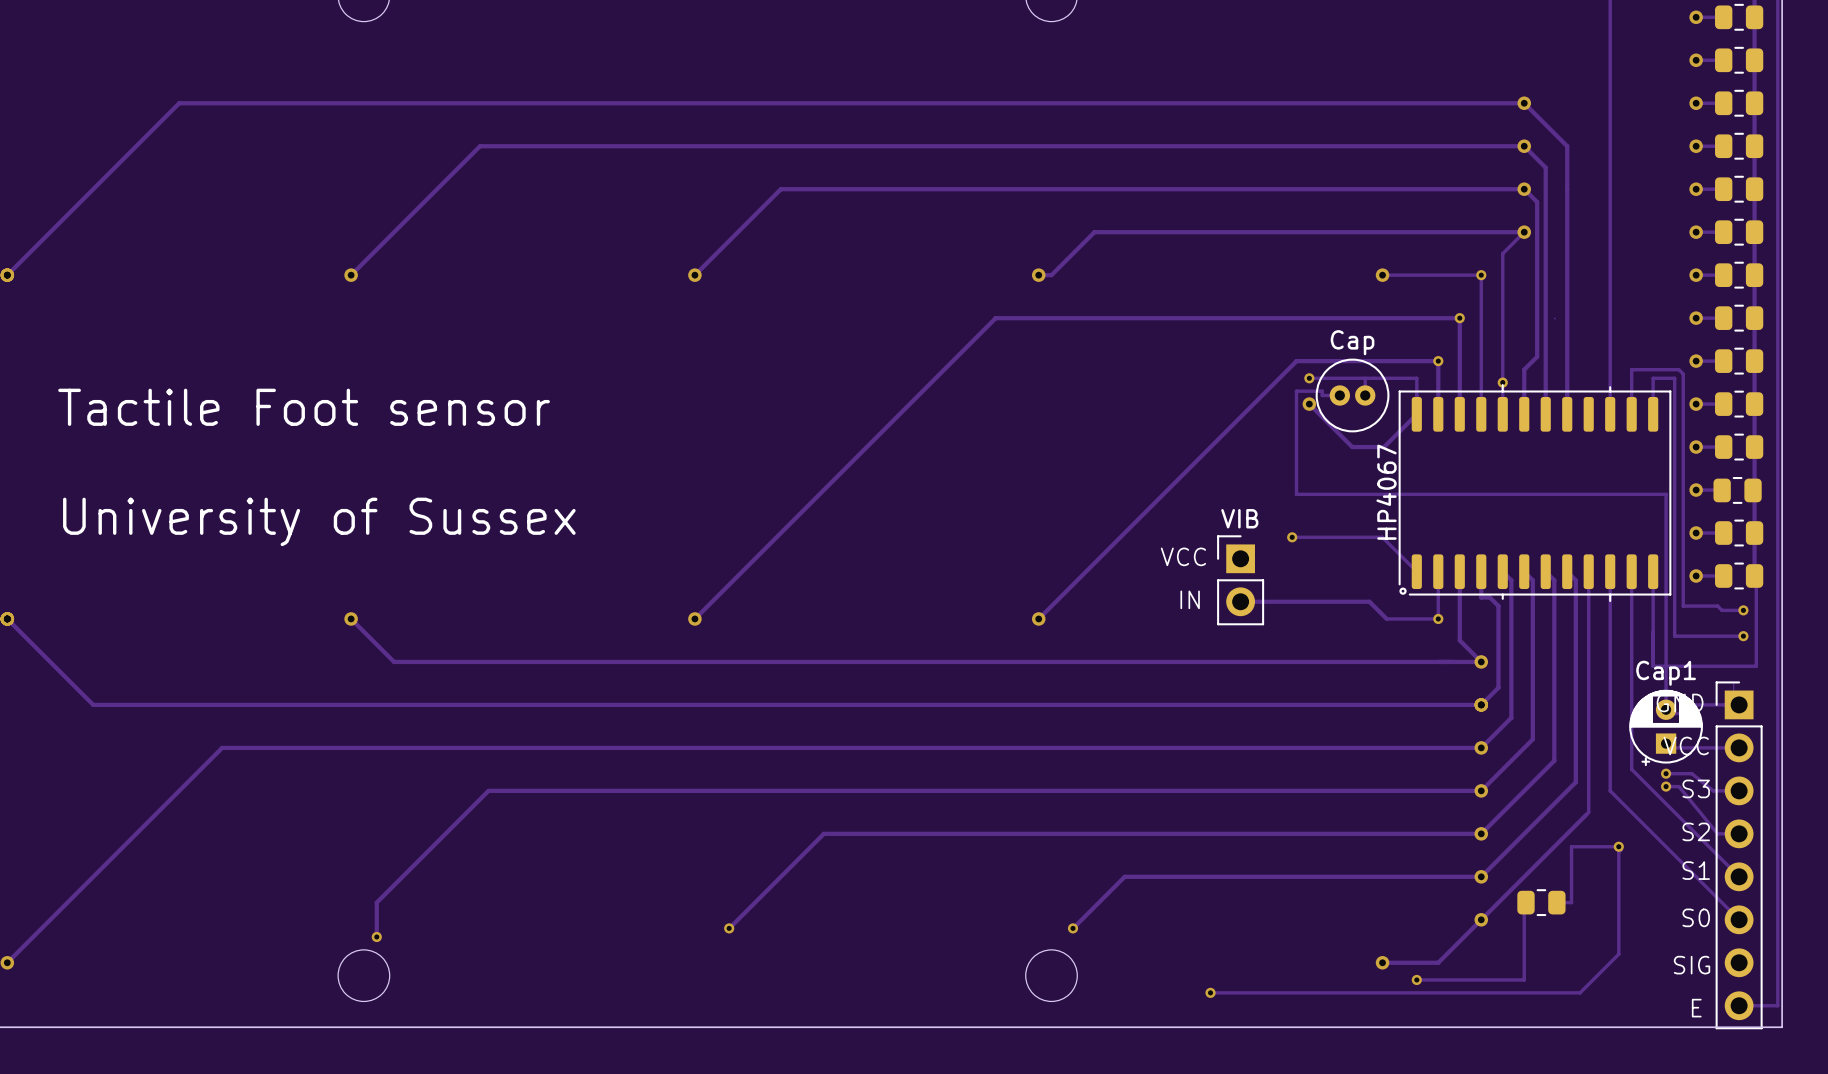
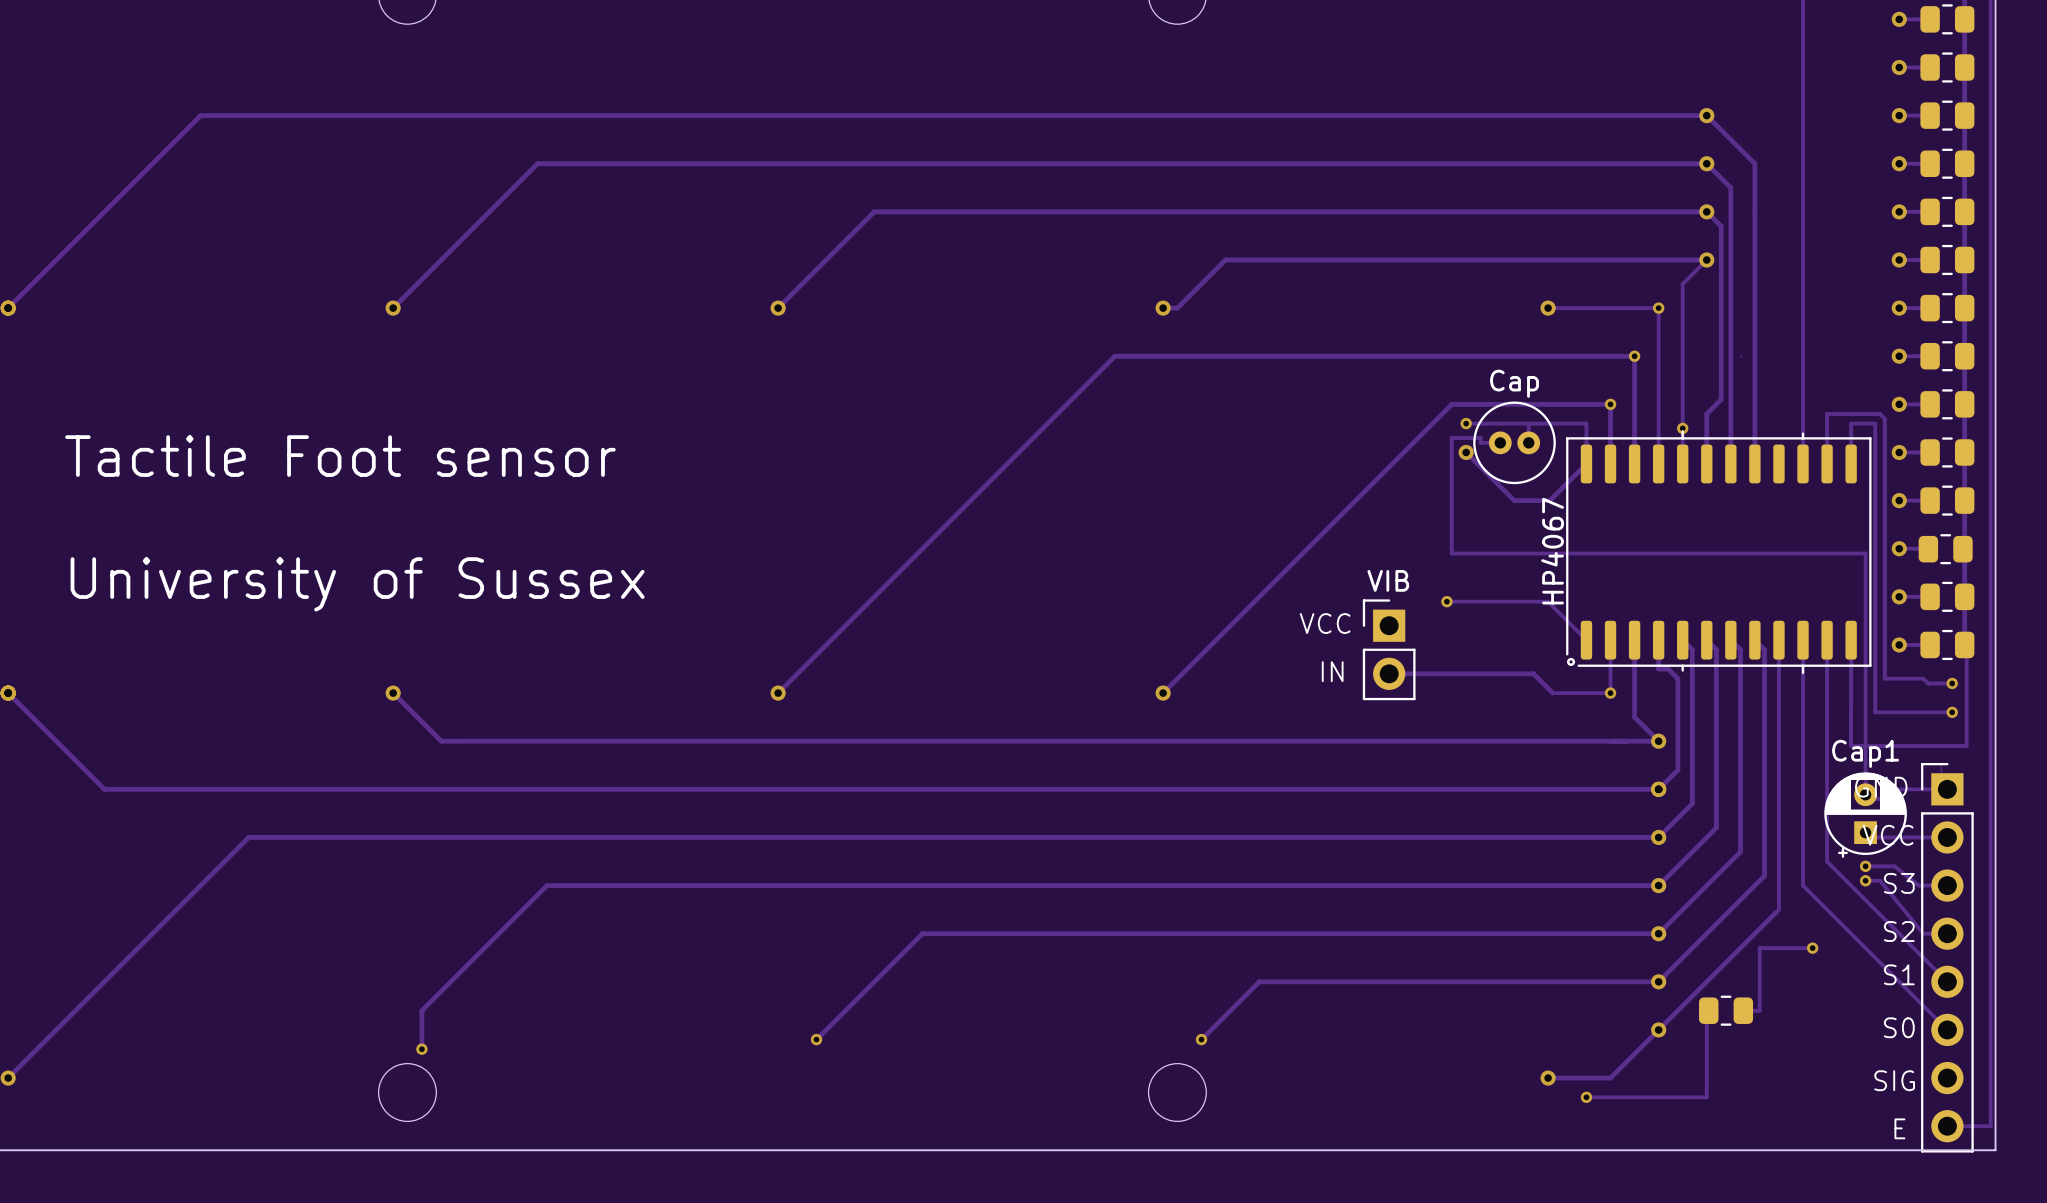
track: (1618, 846) (1618, 954) -> none
track: (1618, 954) (1580, 992) -> none
via: (1210, 992) -> none
track: (1580, 992) (1210, 992) (1580, 992) -> none

